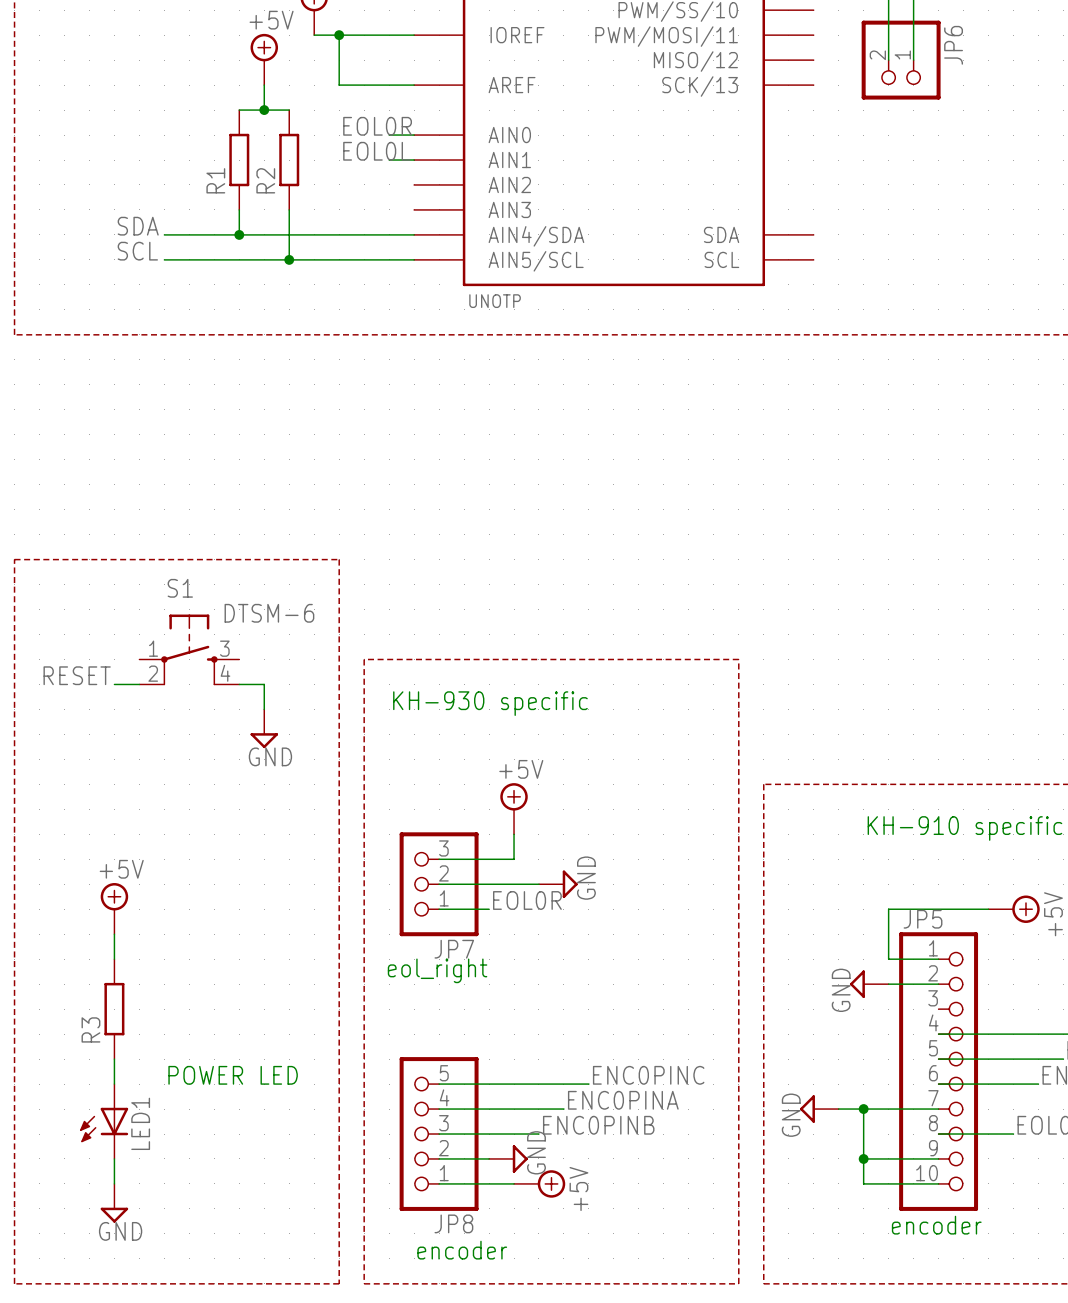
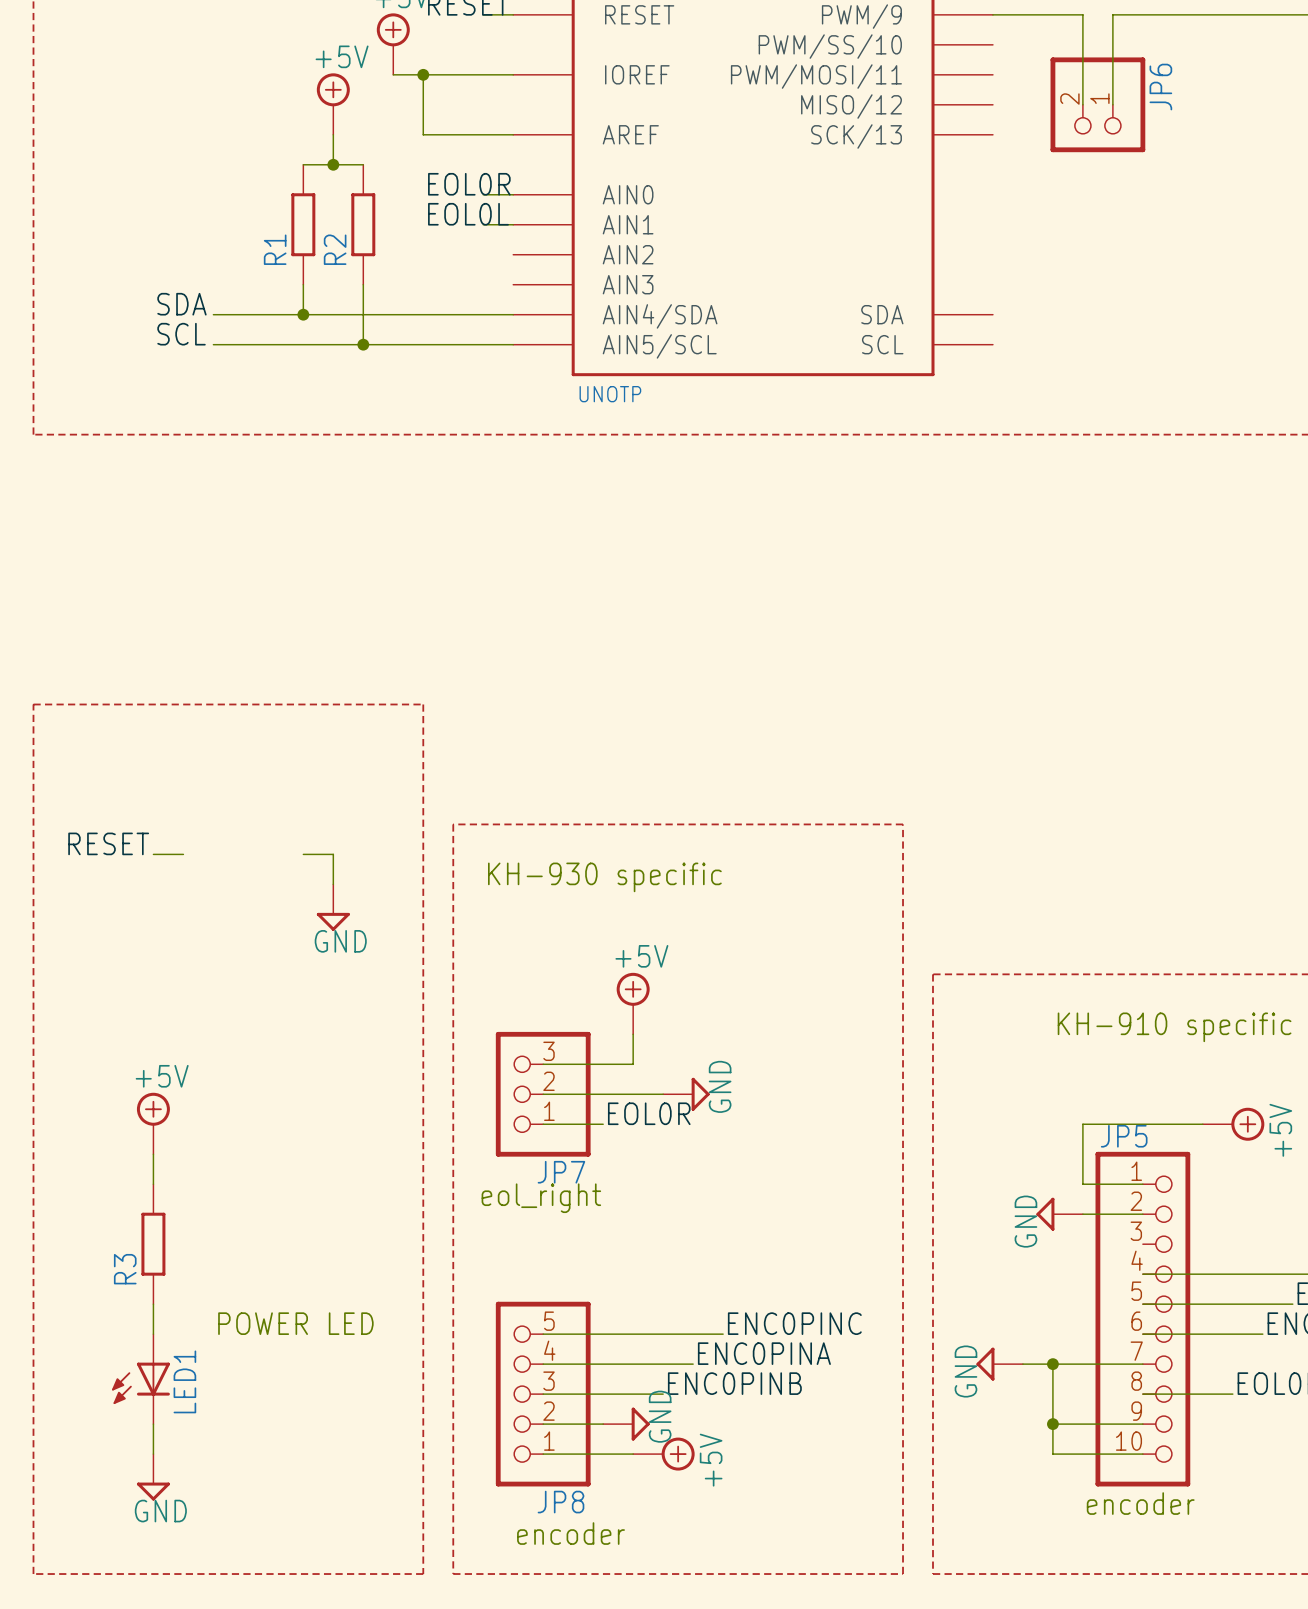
S1: DTSM-6 (189, 649) -> none

